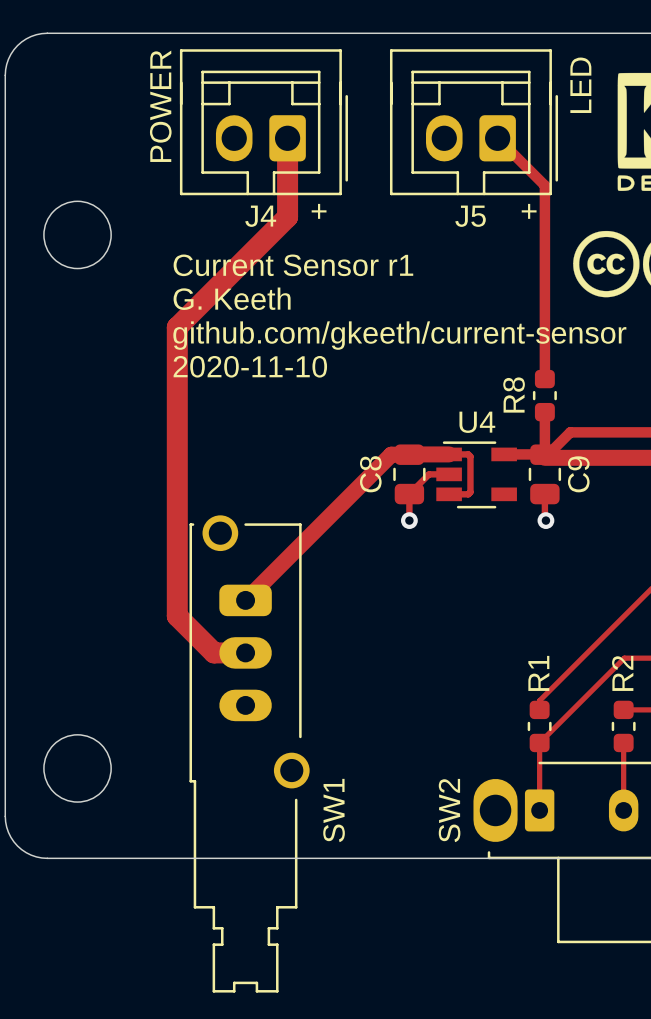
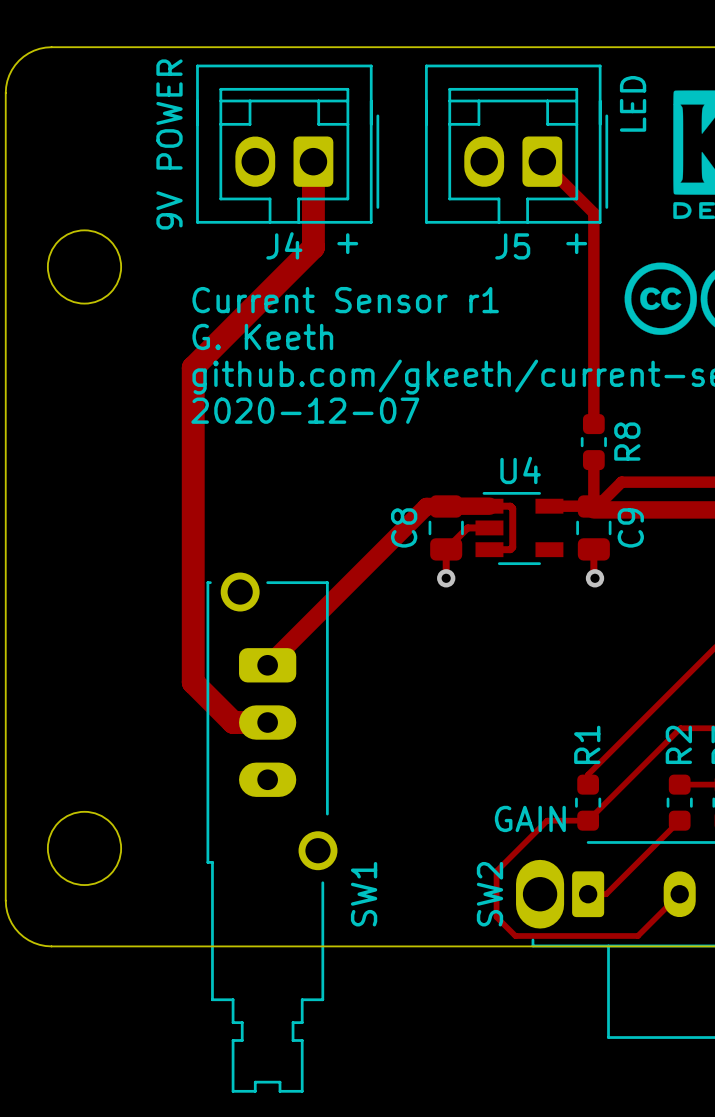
J4 text: POWER (160, 106) -> none
J4 text: none -> 9V POWER (169, 144)
text: 2020-11-10 (250, 366) -> 2020-12-07 (305, 410)
R8 name position: R8 (514, 395) -> R8 (627, 441)
SW2 text: none -> GAIN (530, 818)
track: (539, 742) (539, 810) -> (588, 820) (547, 820) (496, 871) (496, 917) (515, 935) (637, 935) (679, 894)
track: (623, 742) (623, 810) -> (679, 820) (606, 894) (588, 894)

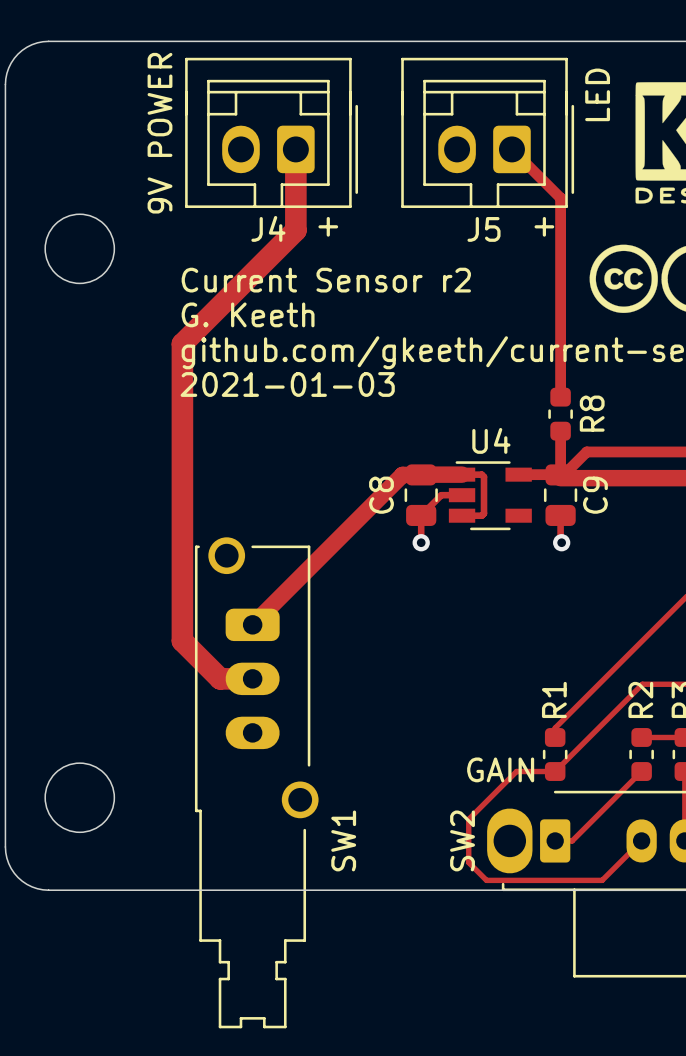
text: Current Sensor r1 (345, 300) -> Current Sensor r2 (326, 280)
text: 2020-12-07 (305, 410) -> 2021-01-03 (287, 384)

